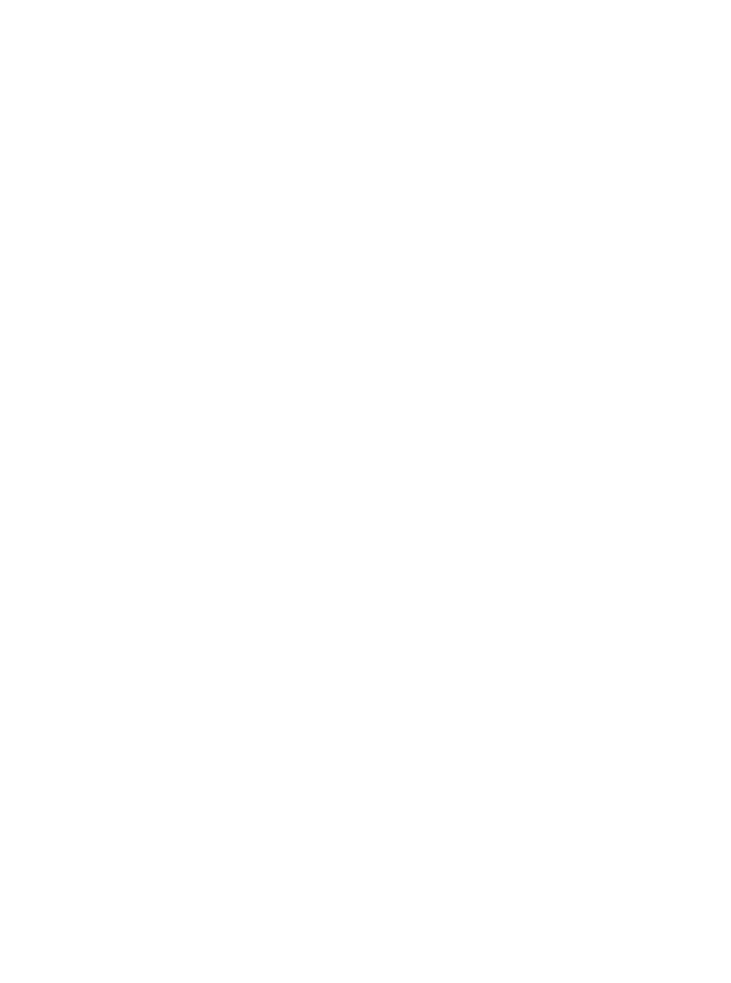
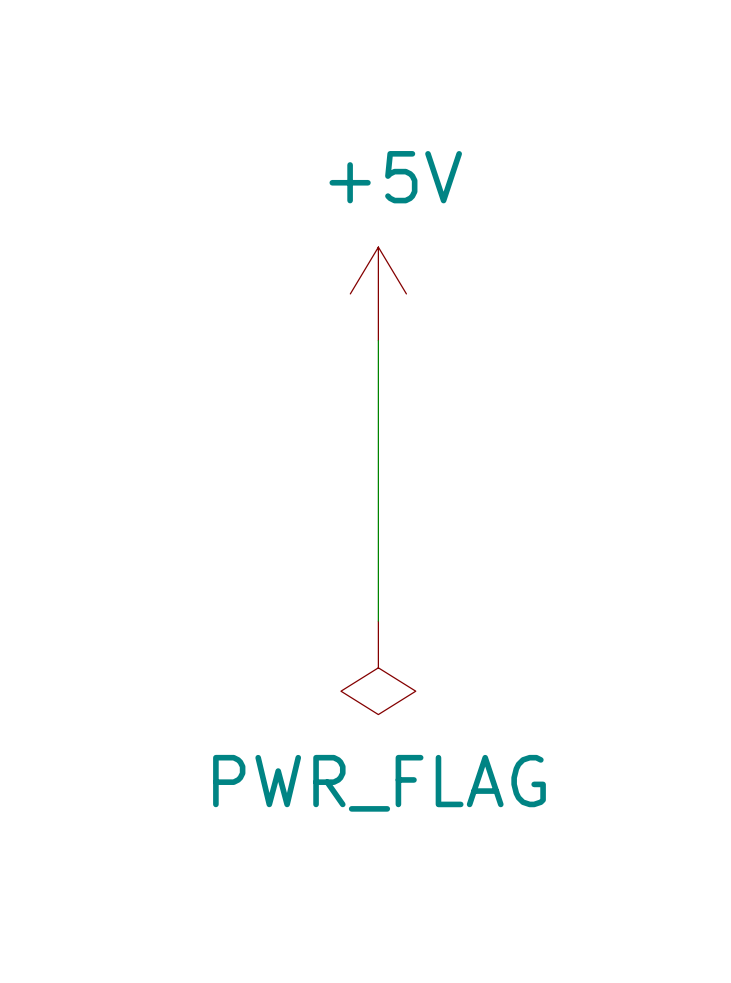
power symbol: none -> +5V (378, 293)
wire: none -> (378, 340) (378, 621)
power symbol: none -> PWR_FLAG (378, 667)

